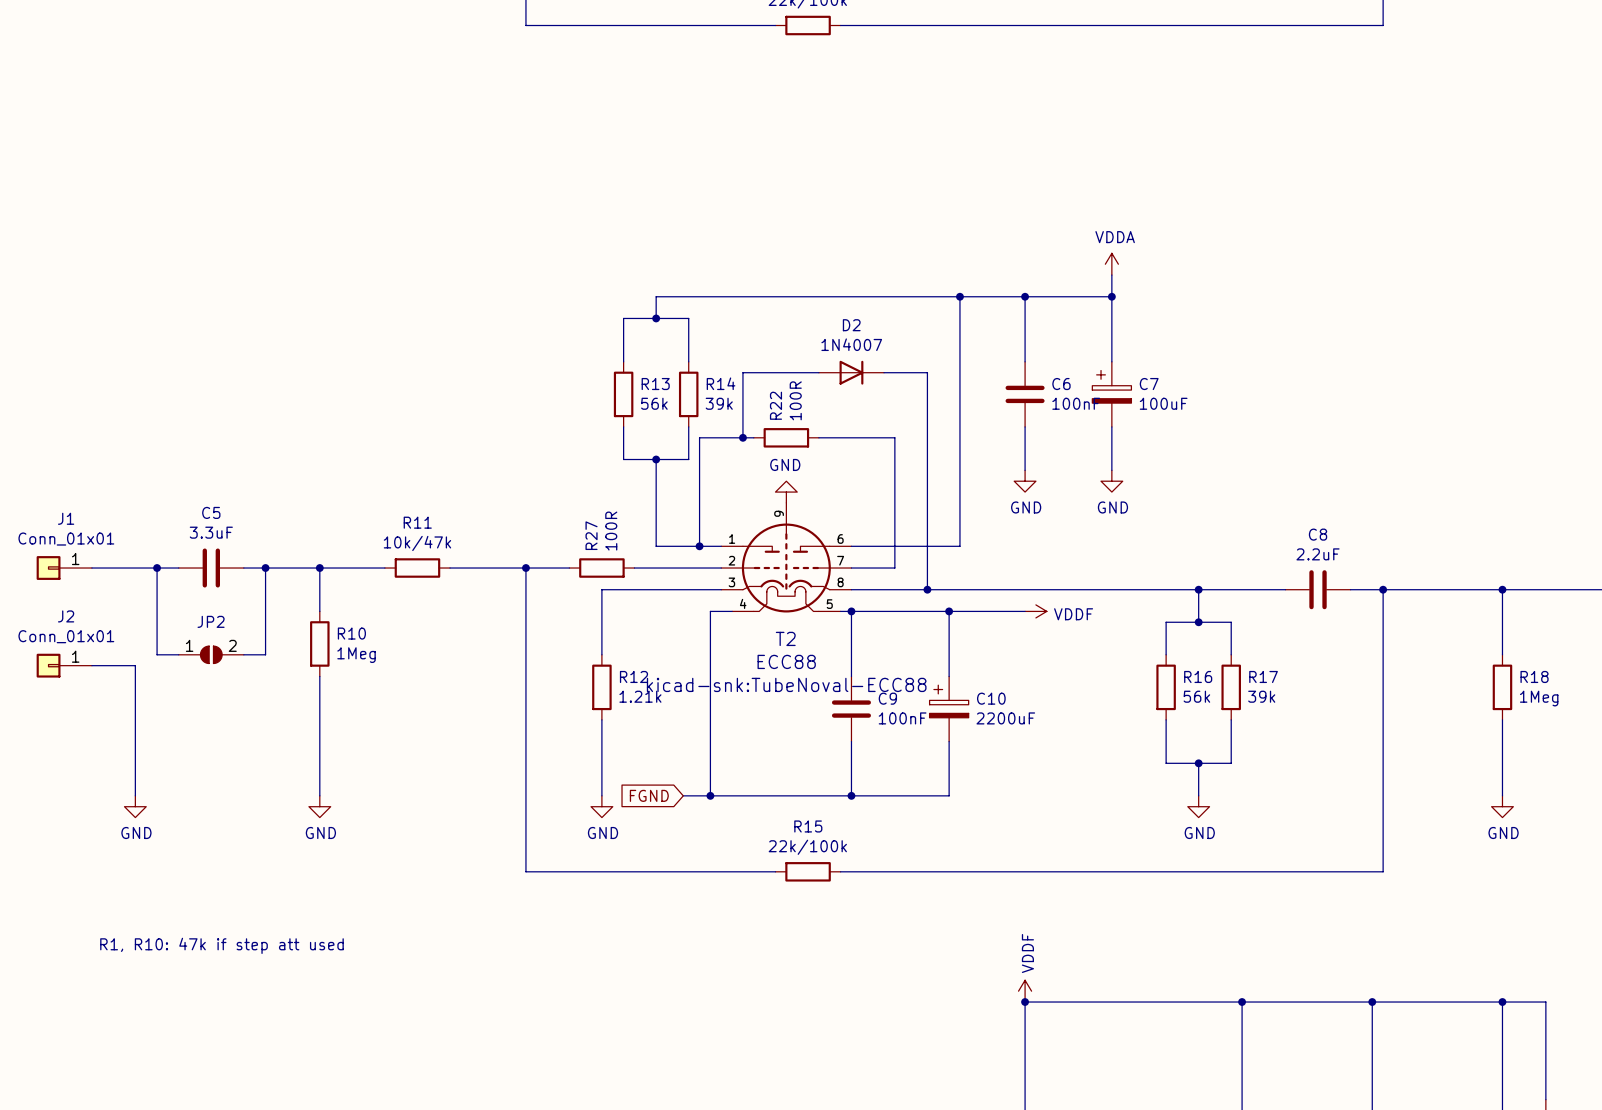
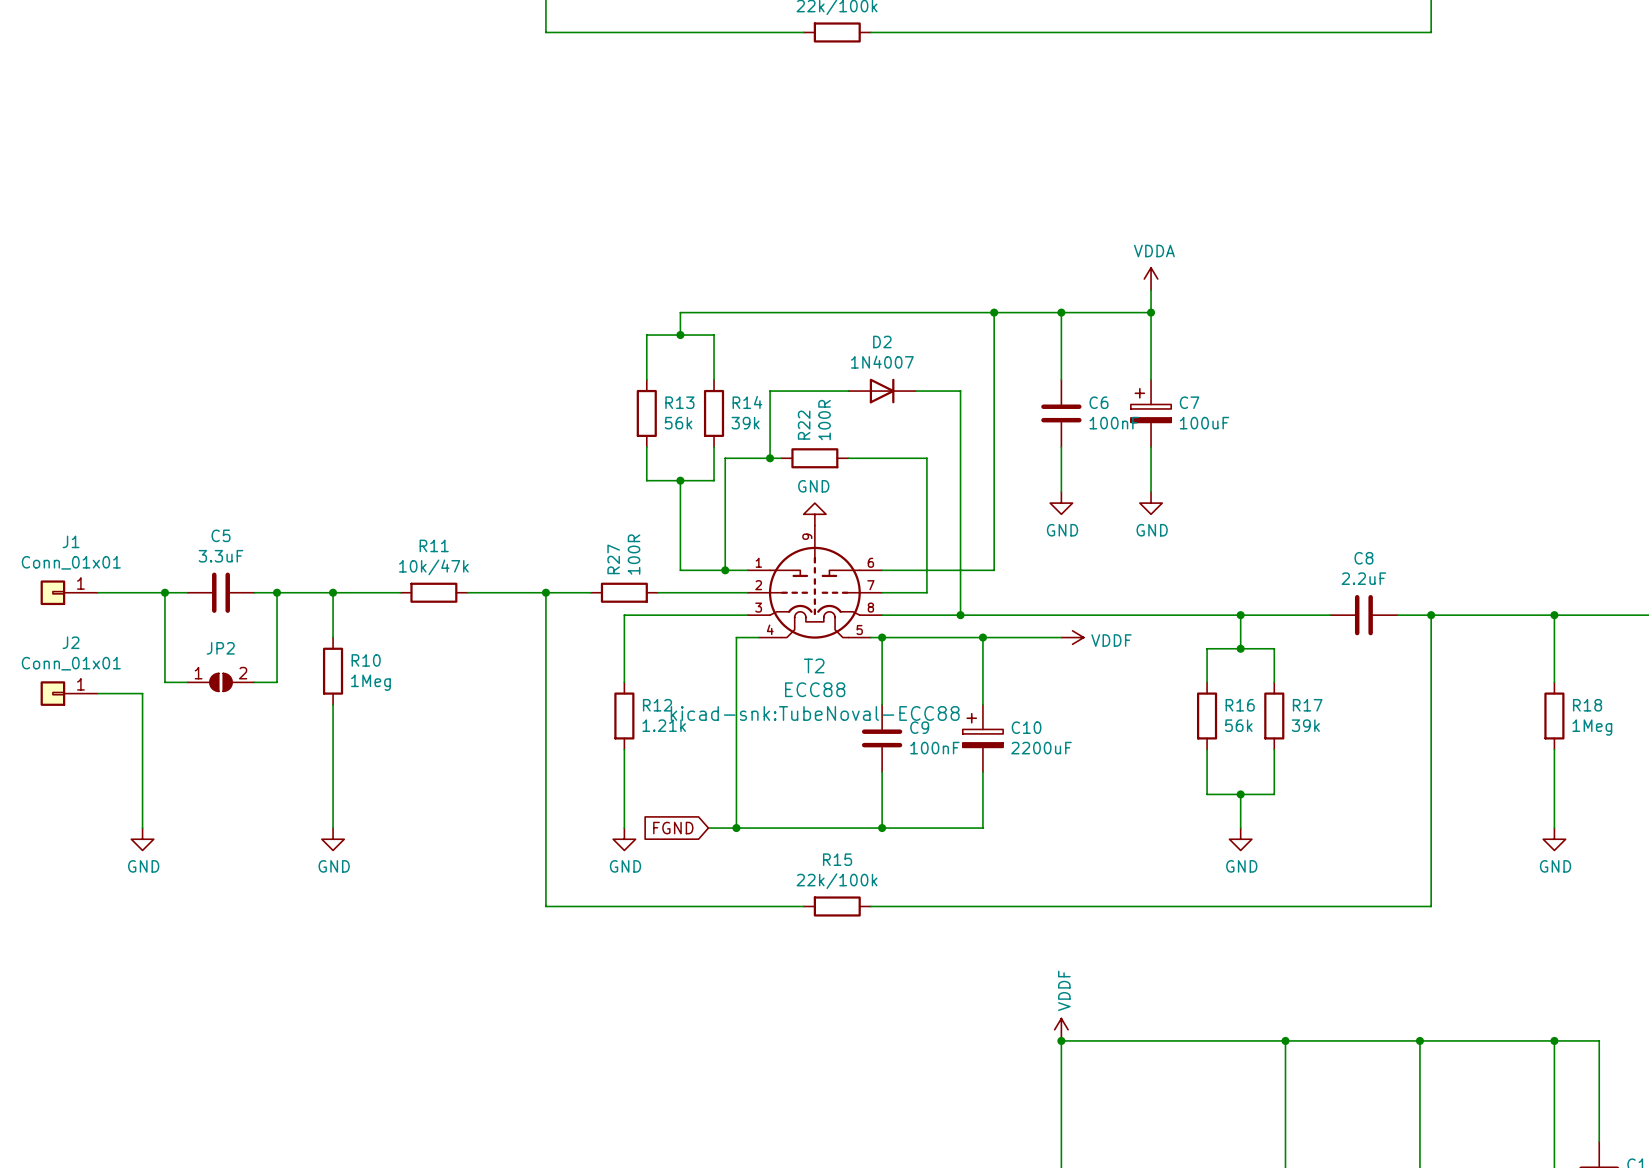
text: R1, R10: 47k if step att used (221, 945) -> none

